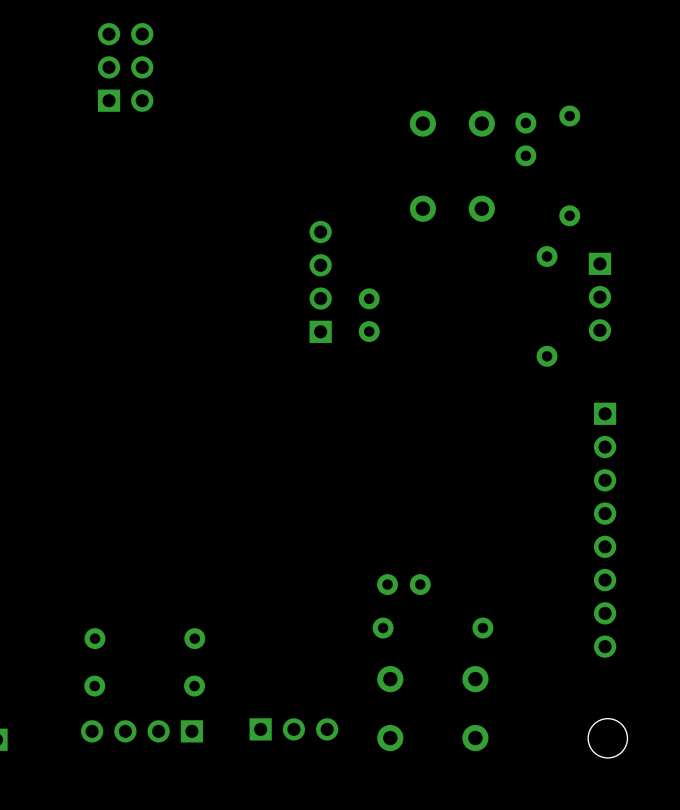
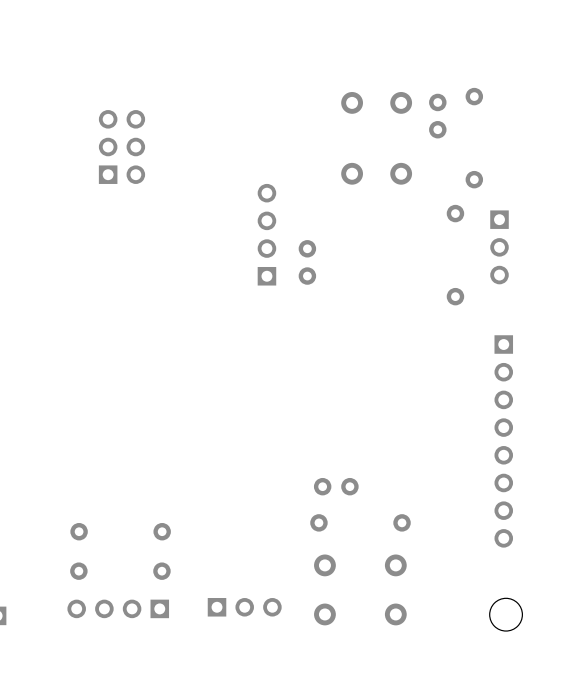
part position: (125, 67) -> (121, 147)

